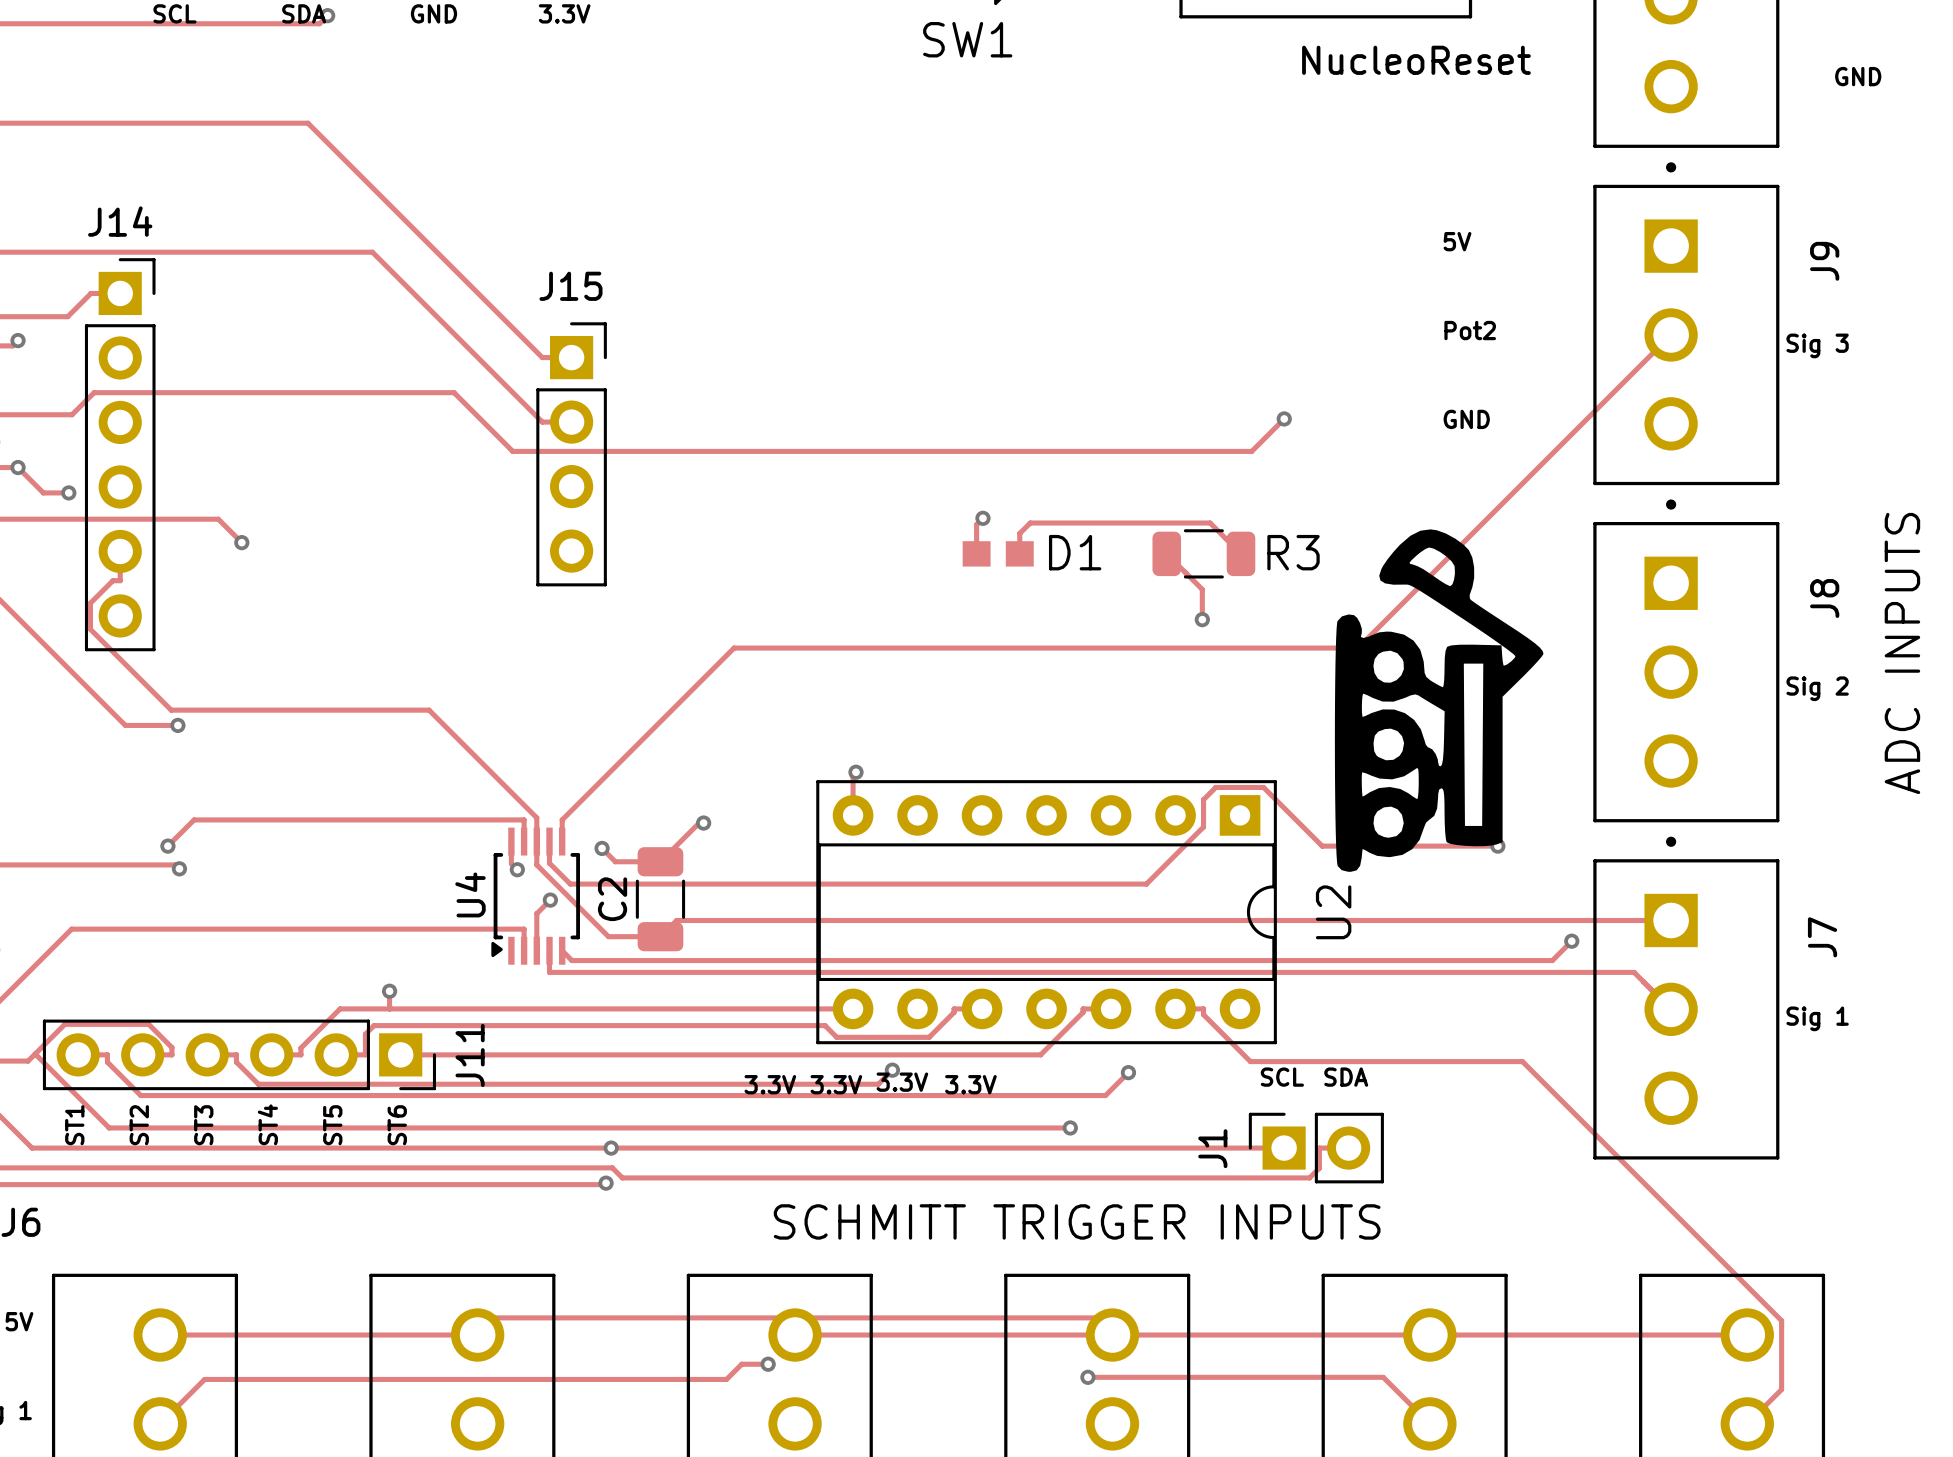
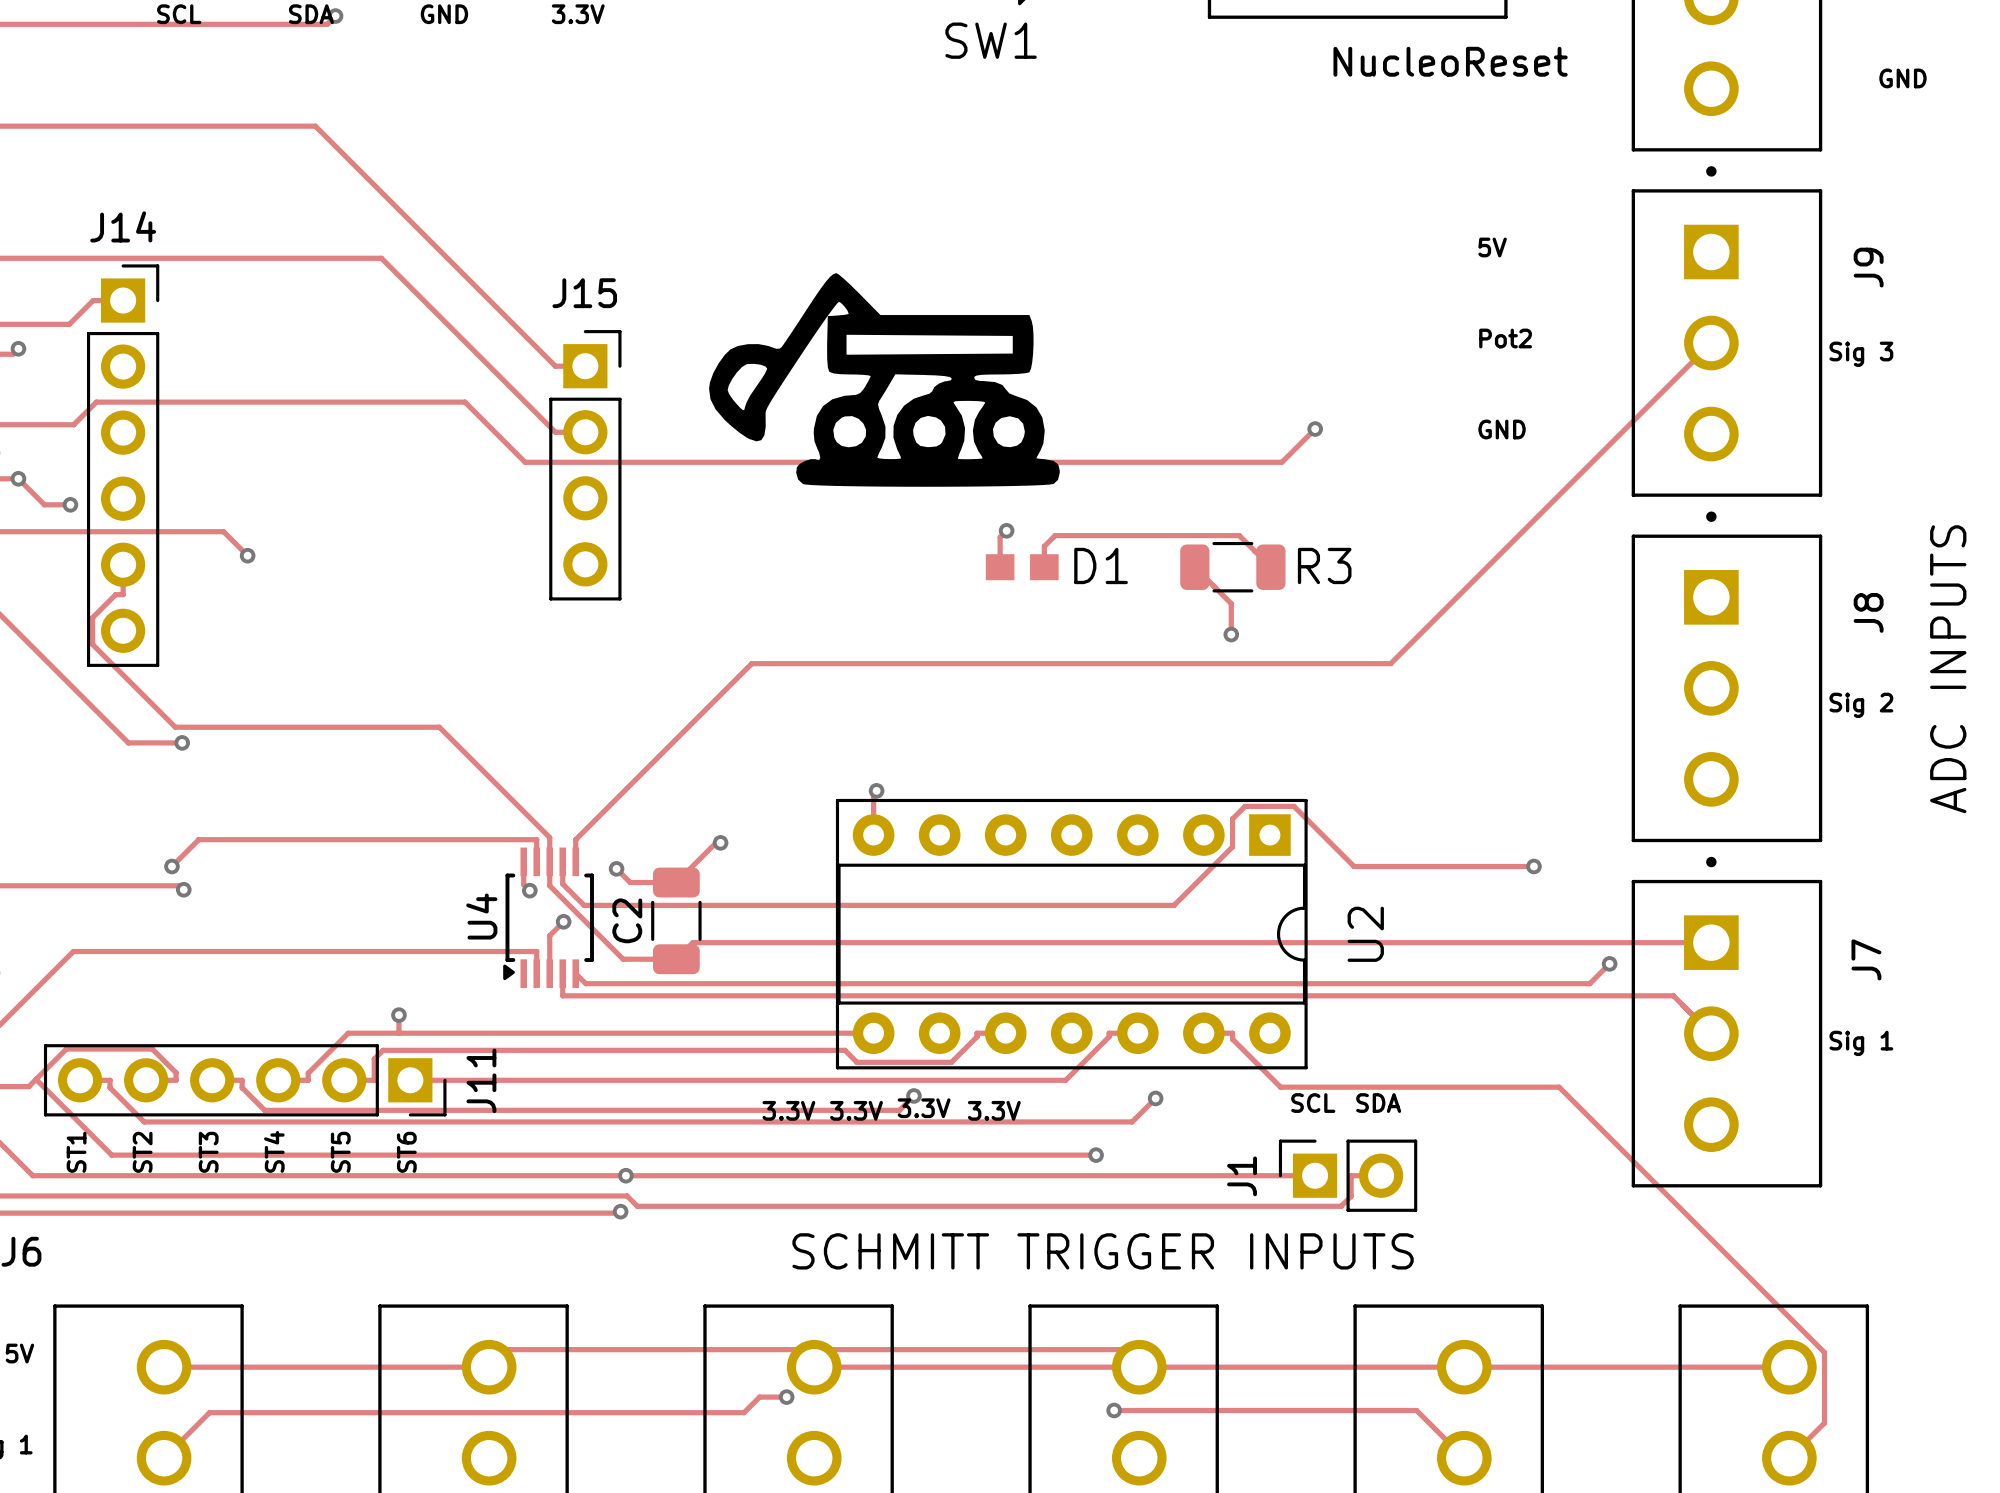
drawing: none -> [709, 273, 1060, 487]
drawing: [1334, 529, 1544, 872] -> none

